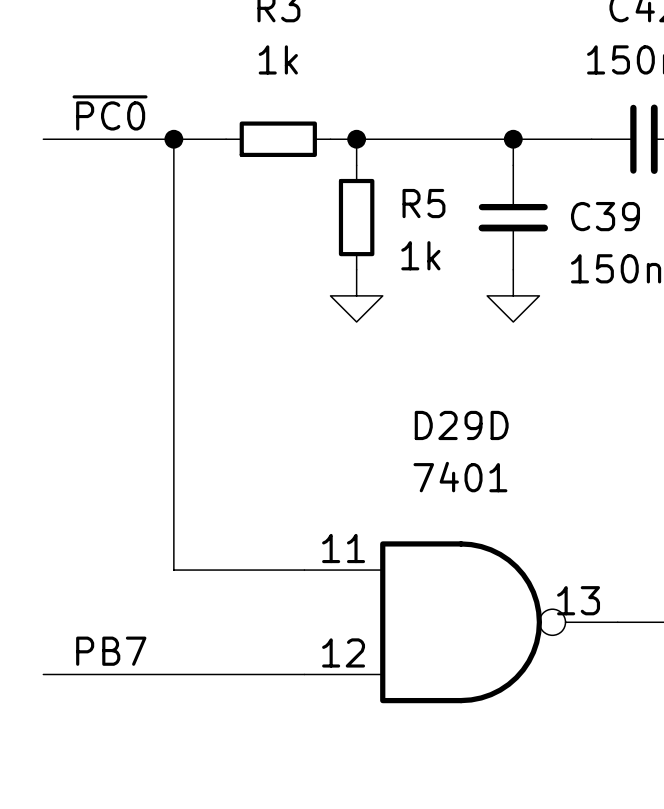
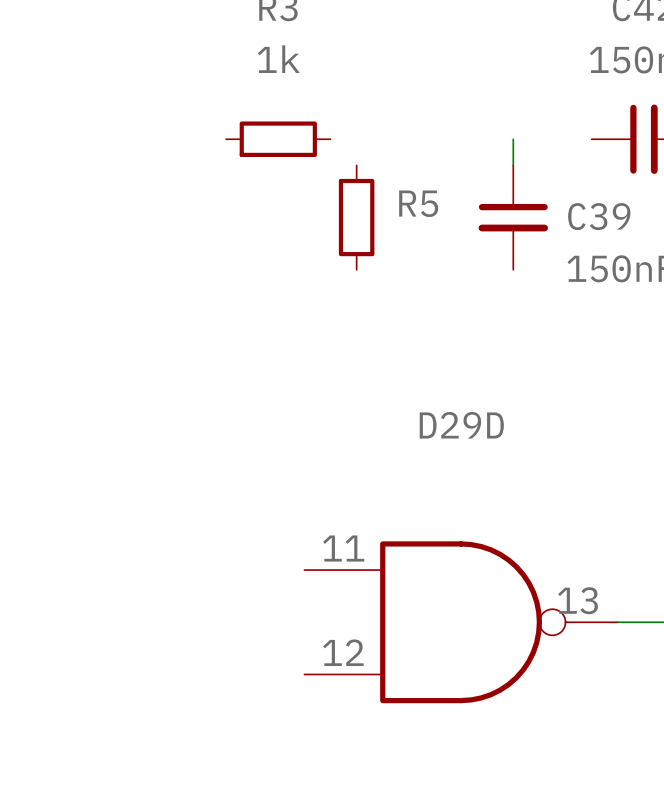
label: ~{PC0} (110, 112) -> none
wire: (43, 139) (226, 139) -> none
wire: (173, 139) (173, 570) (304, 570) -> none
junction: (173, 139) -> none
wire: (330, 139) (591, 139) -> none
wire: (356, 139) (356, 165) -> none
junction: (356, 139) -> none
junction: (513, 139) -> none
R5 value: 1k (420, 255) -> none
power symbol: (356, 295) -> none
power symbol: (513, 295) -> none
D29D value: 7401 (460, 477) -> none
label: PB7 (111, 651) -> none
wire: (43, 674) (304, 674) -> none

